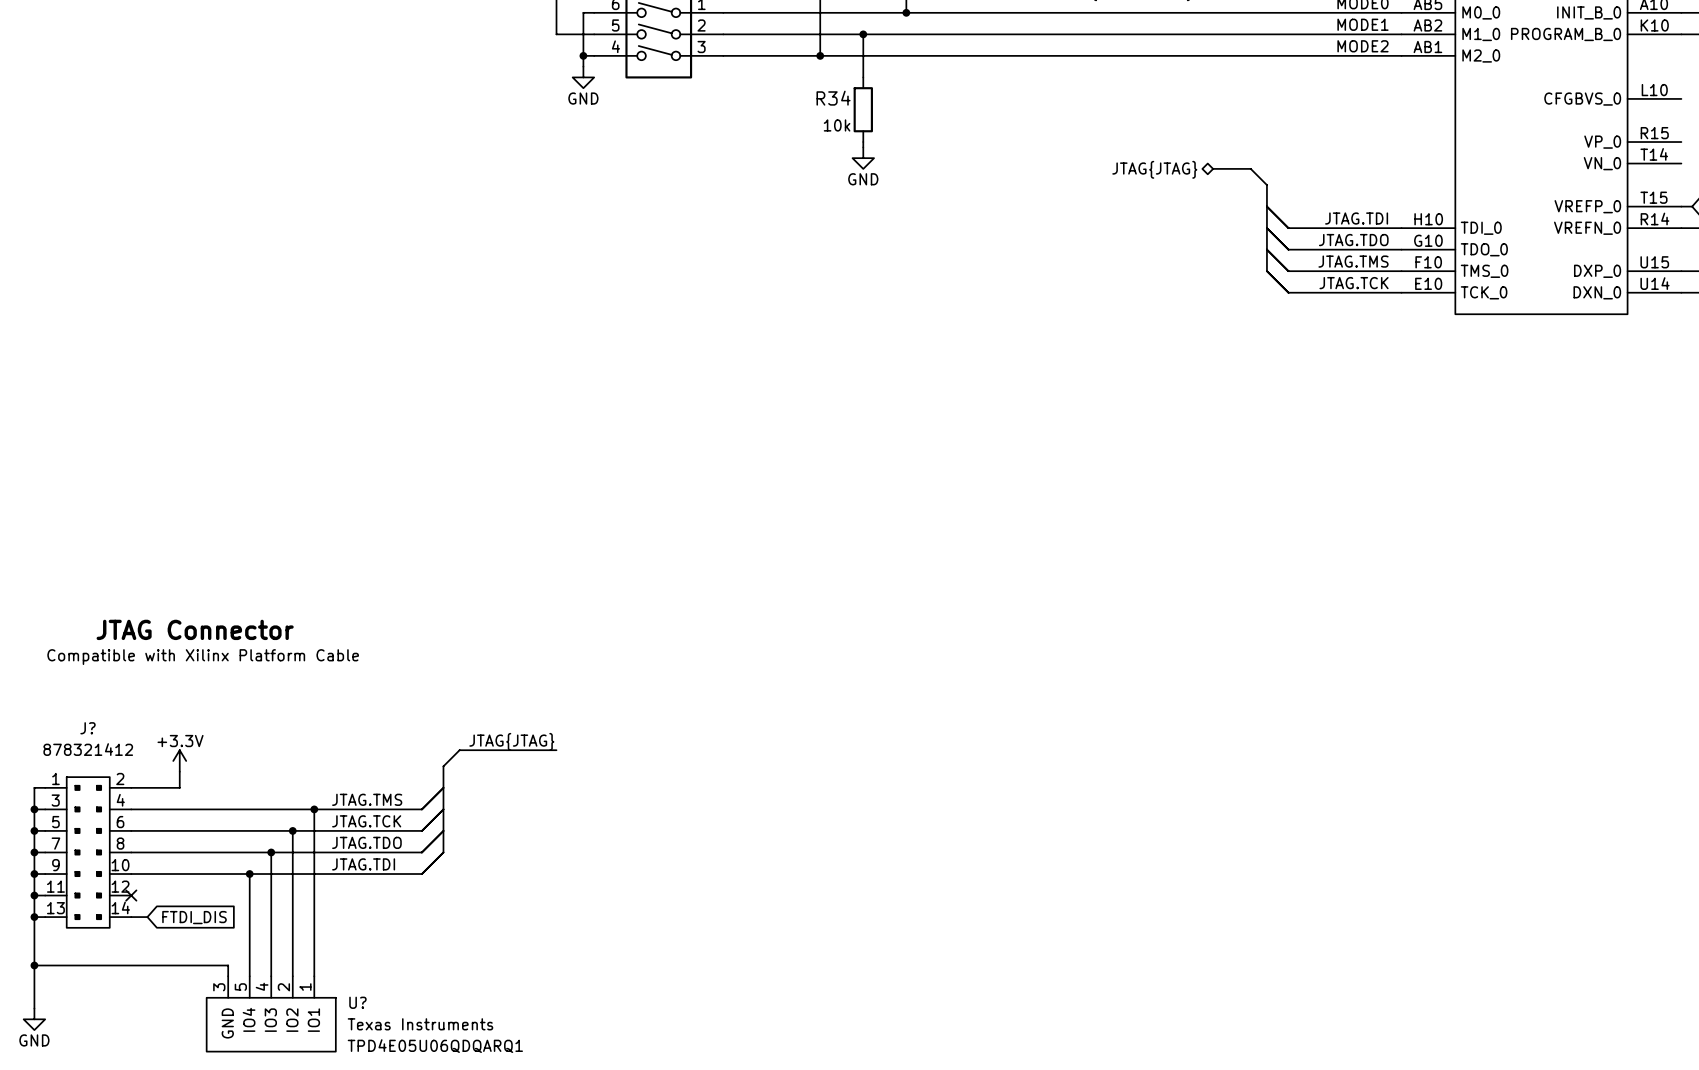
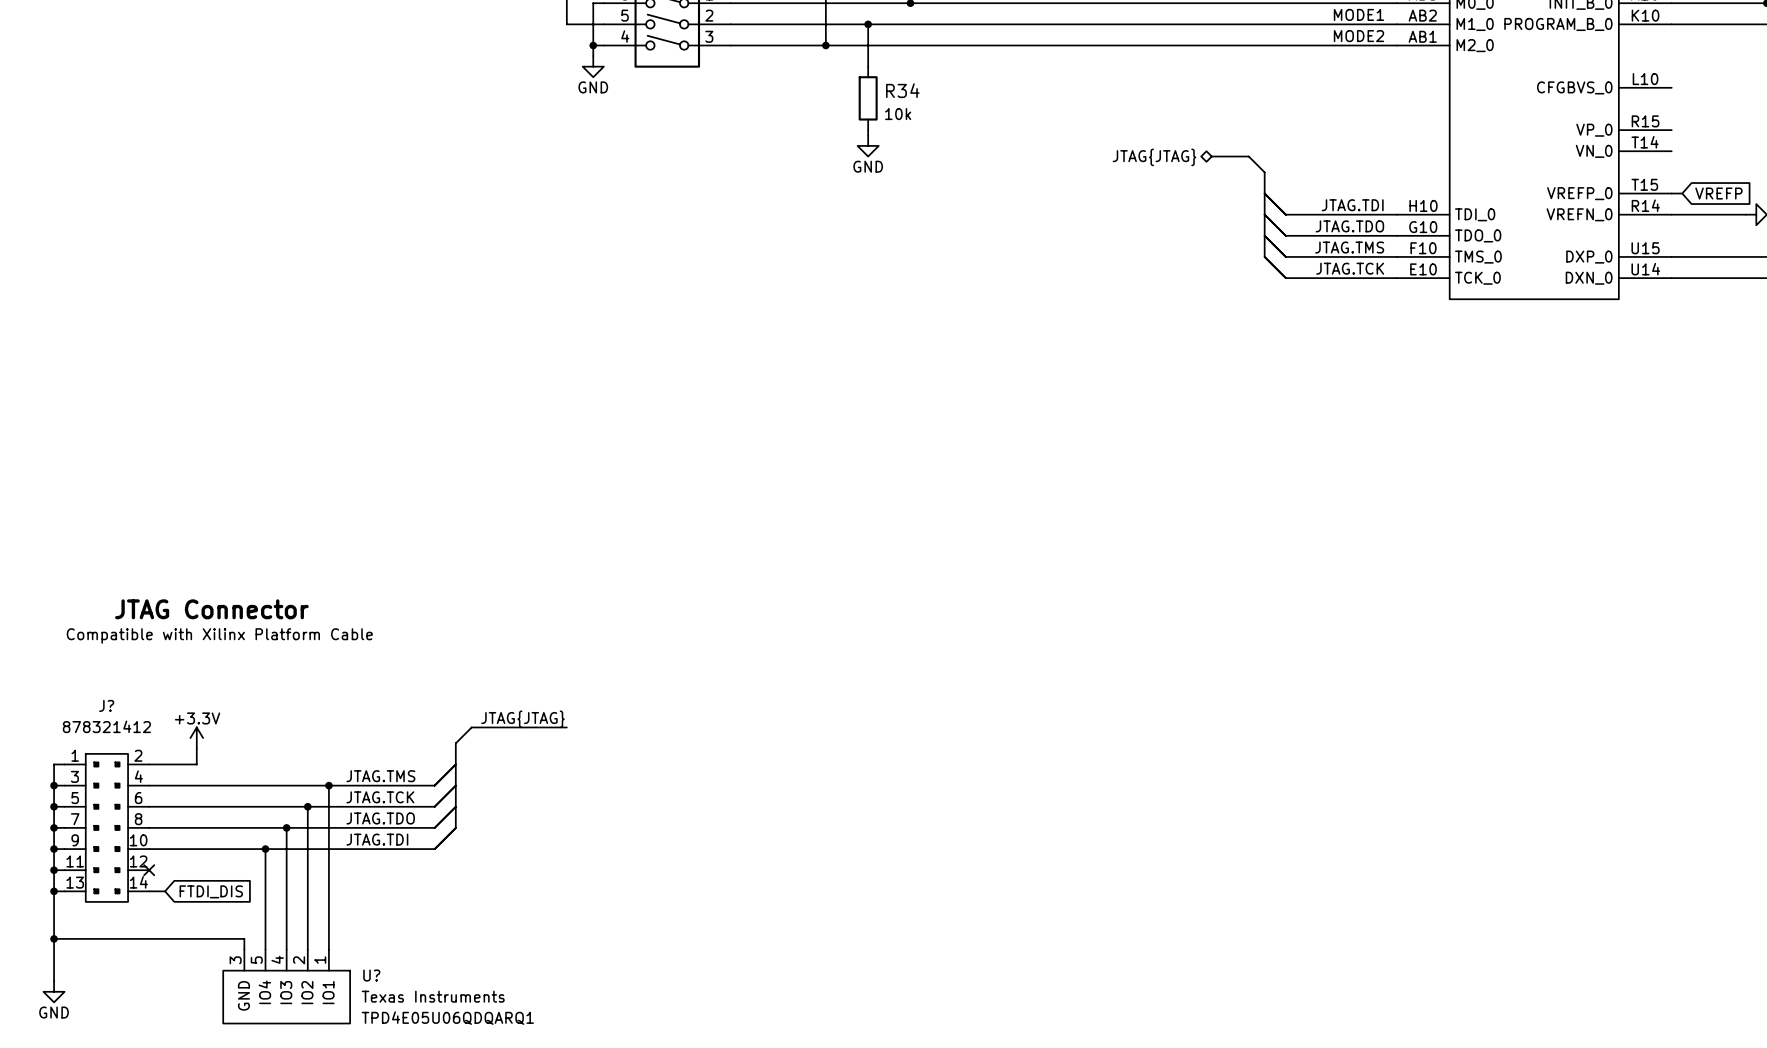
R34 name position: R34 (833, 98) -> R34 (902, 90)
R34 text position: 10k (837, 125) -> 10k (898, 114)

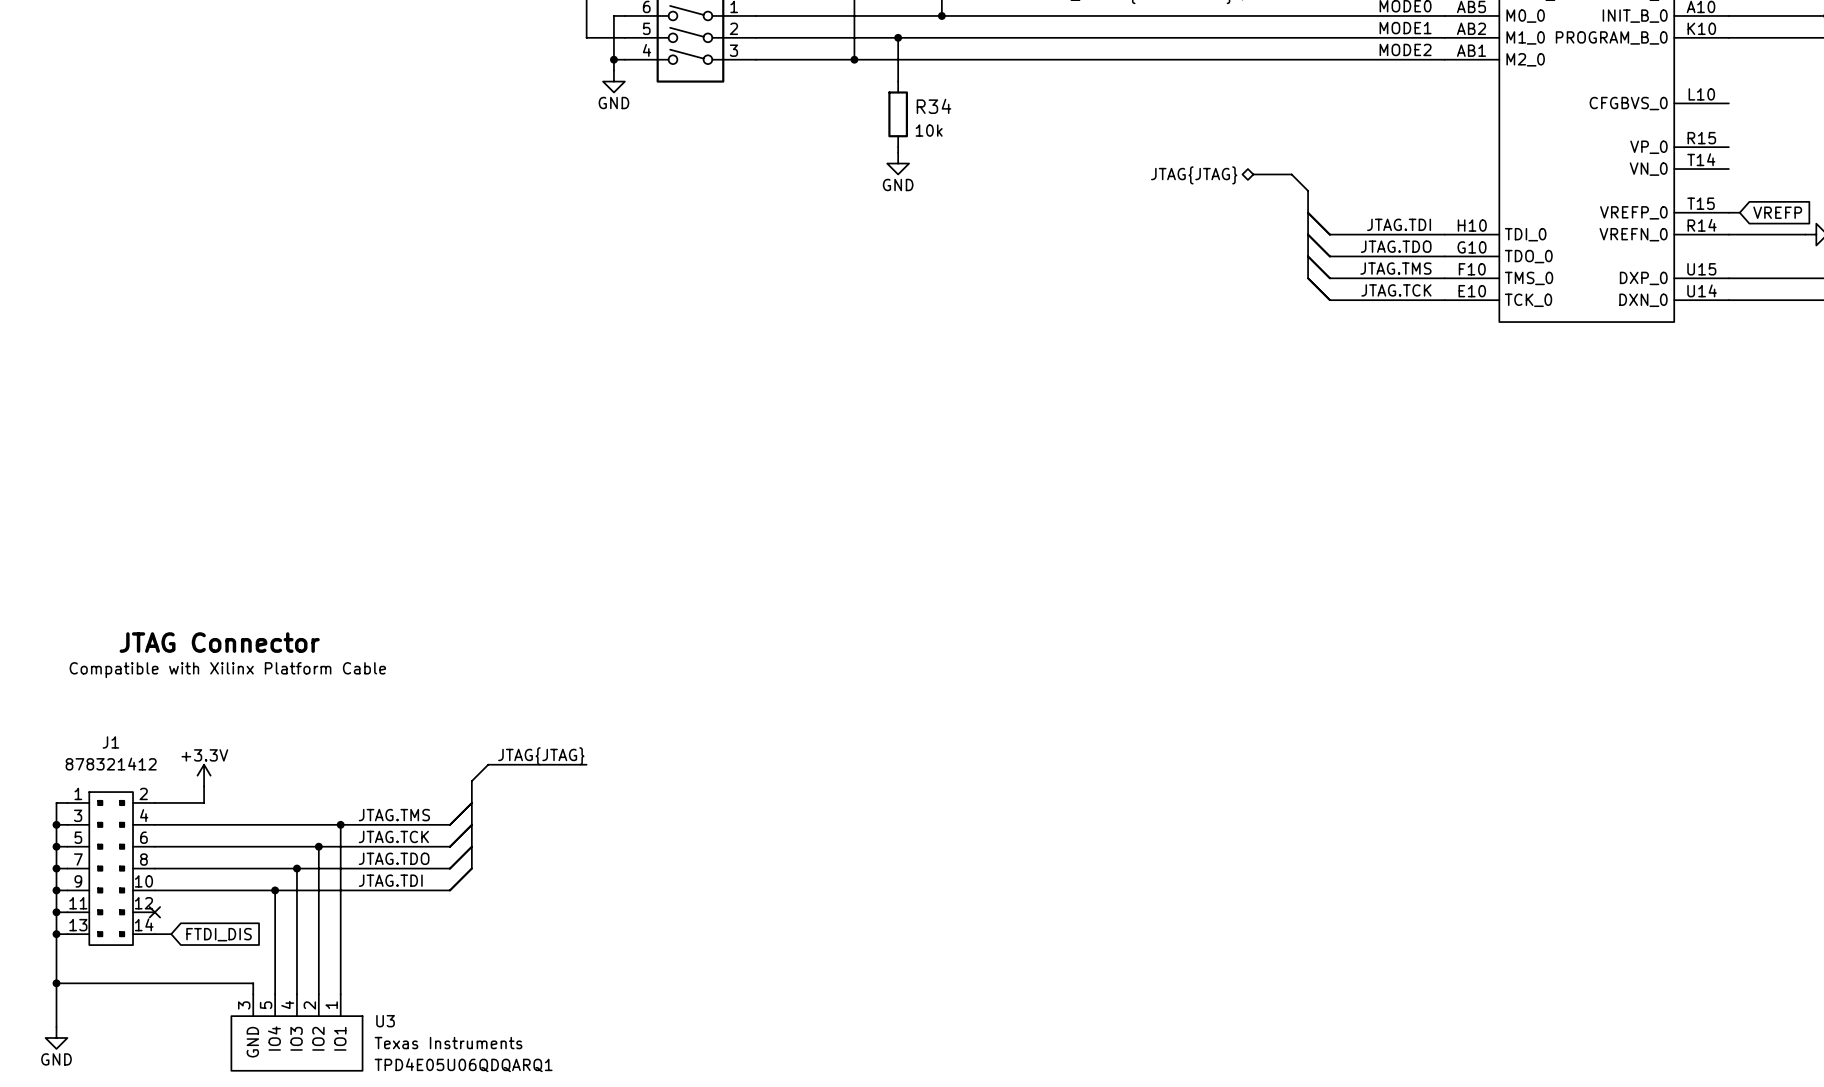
J? name: J? (106, 705) -> J1 (110, 742)
U? name: U? (371, 975) -> U3 (385, 1021)

